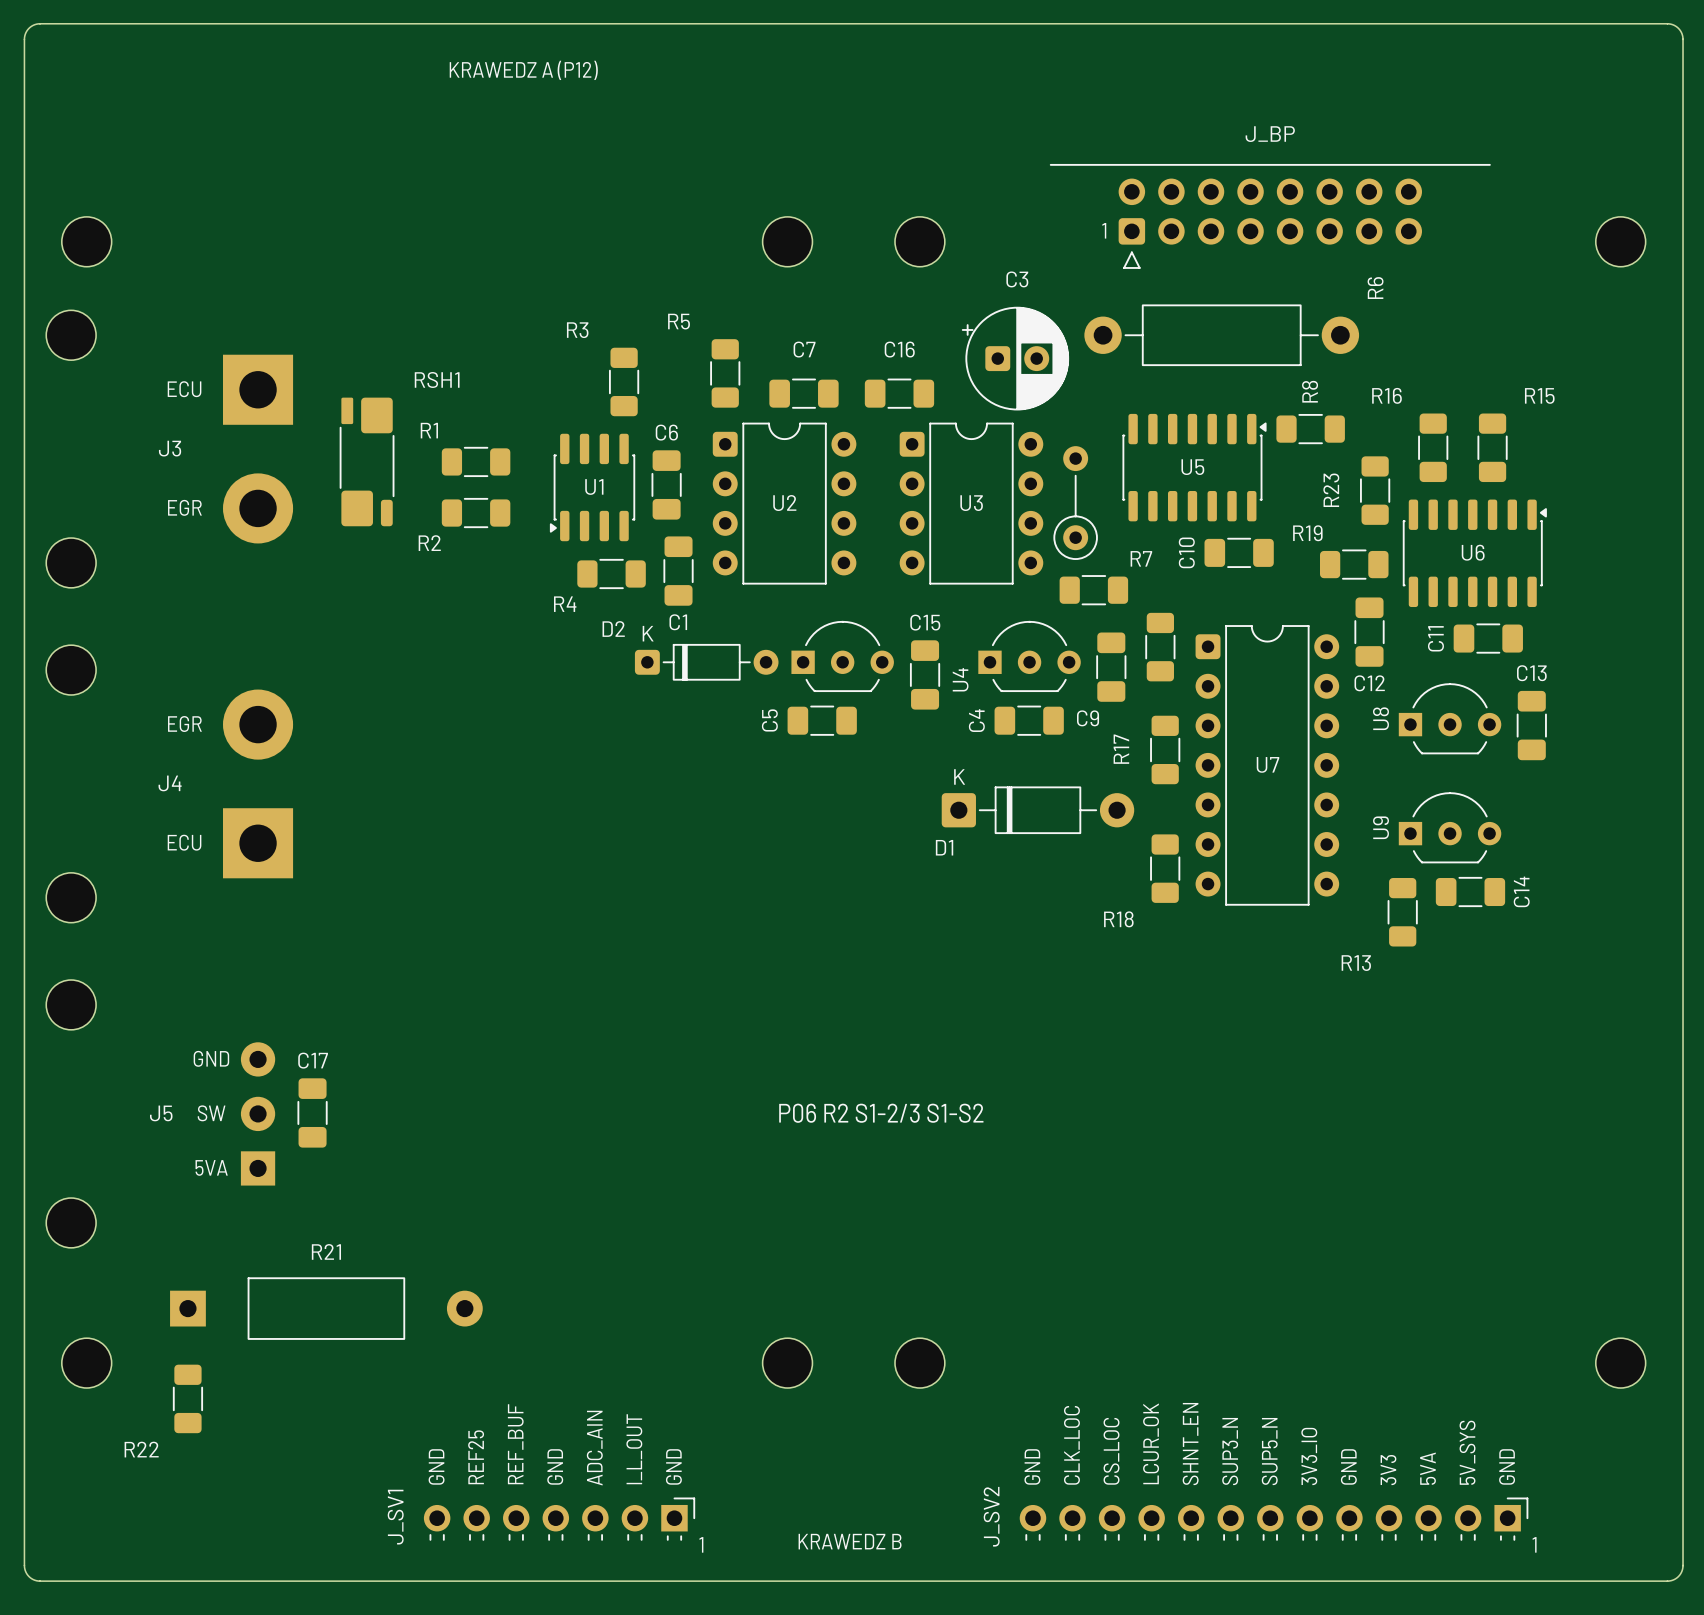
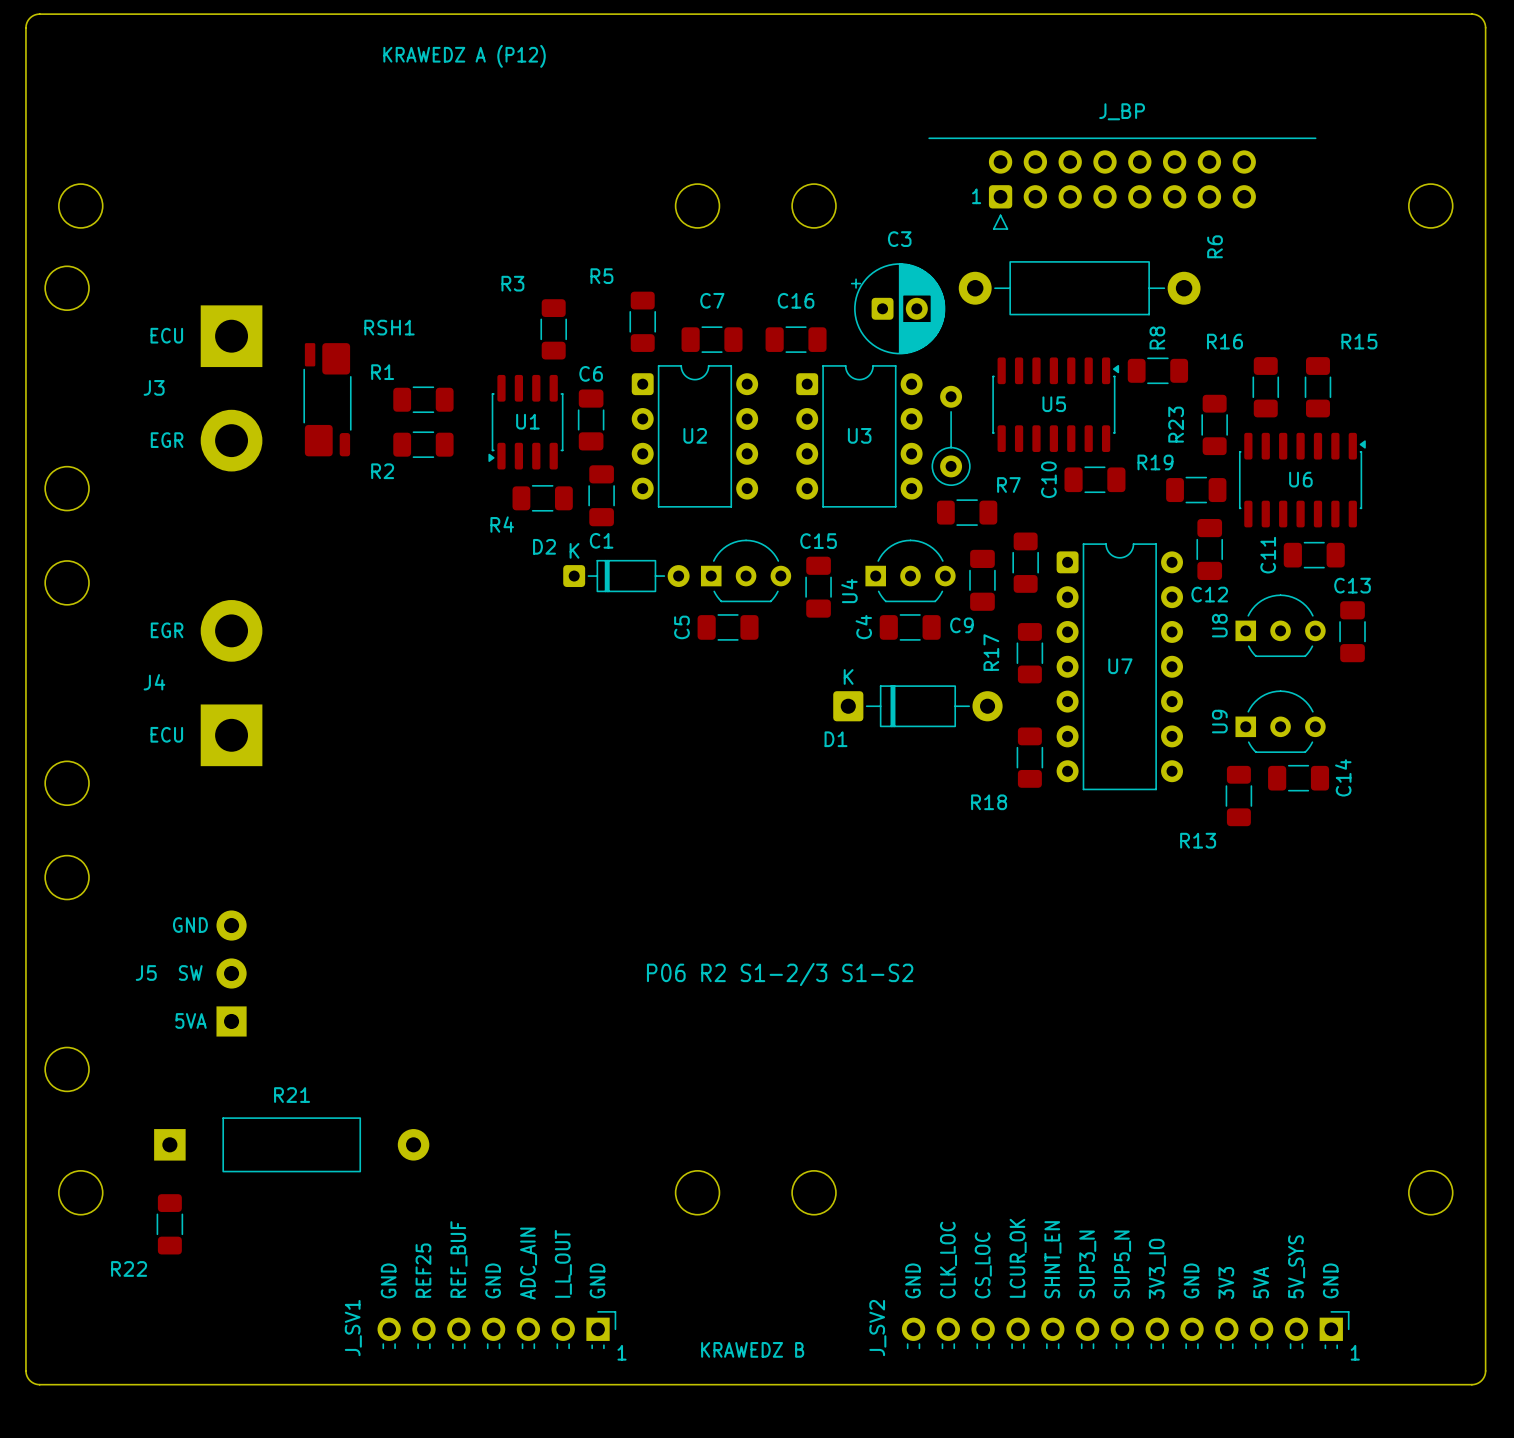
C17: (312, 1112) -> none

